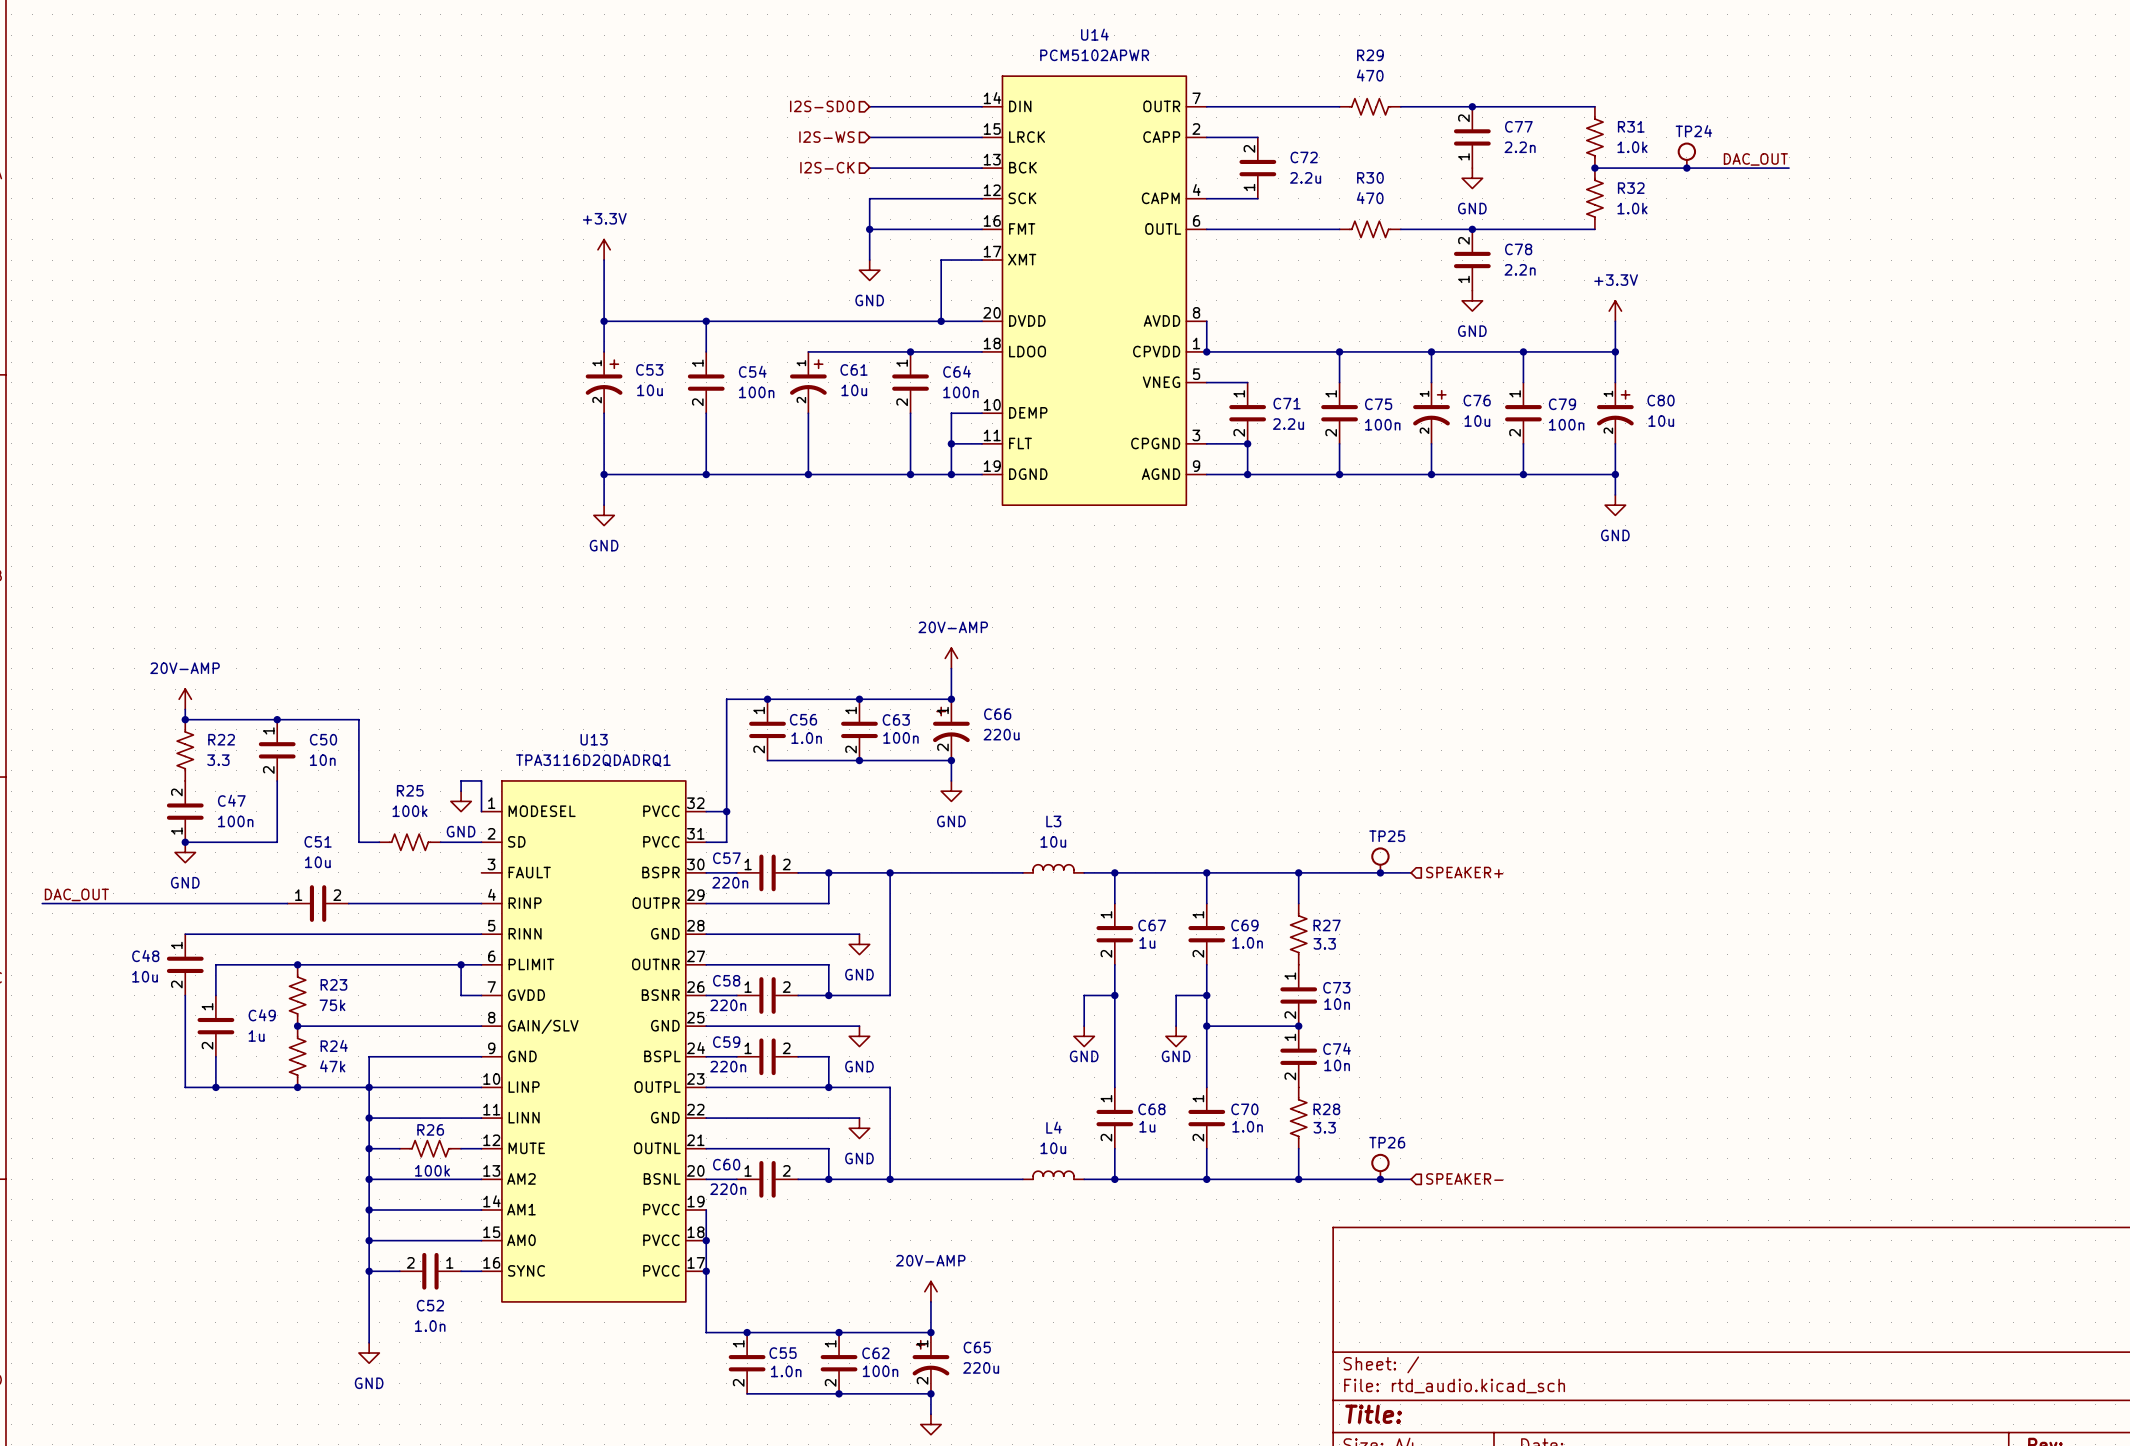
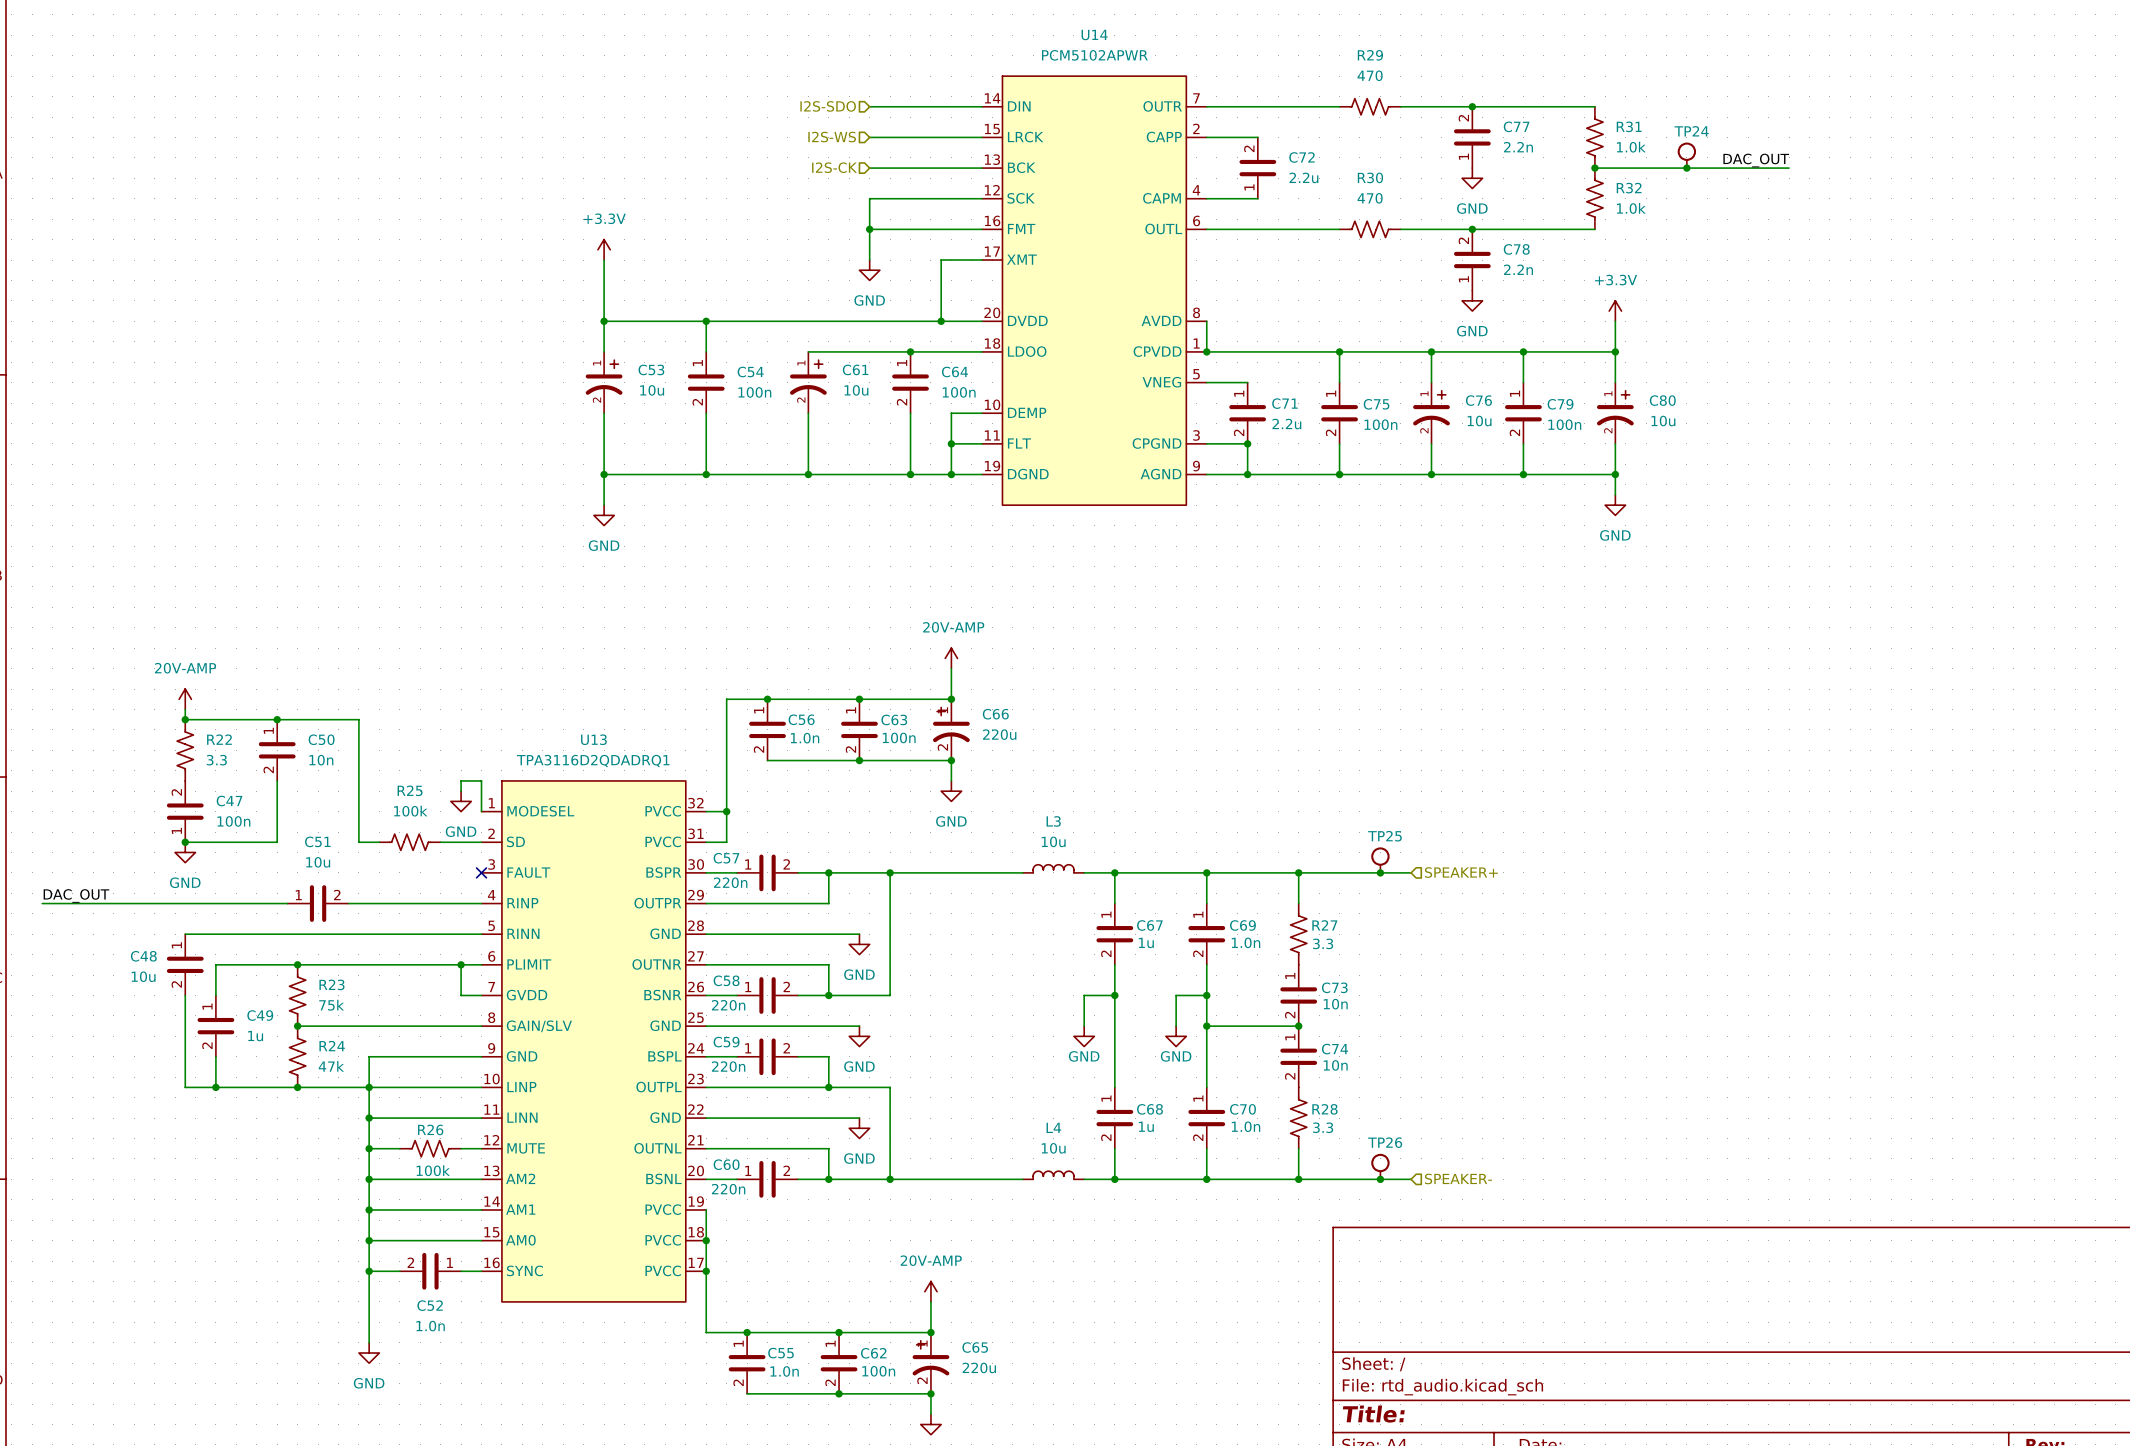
no-connect mark: none -> (481, 872)

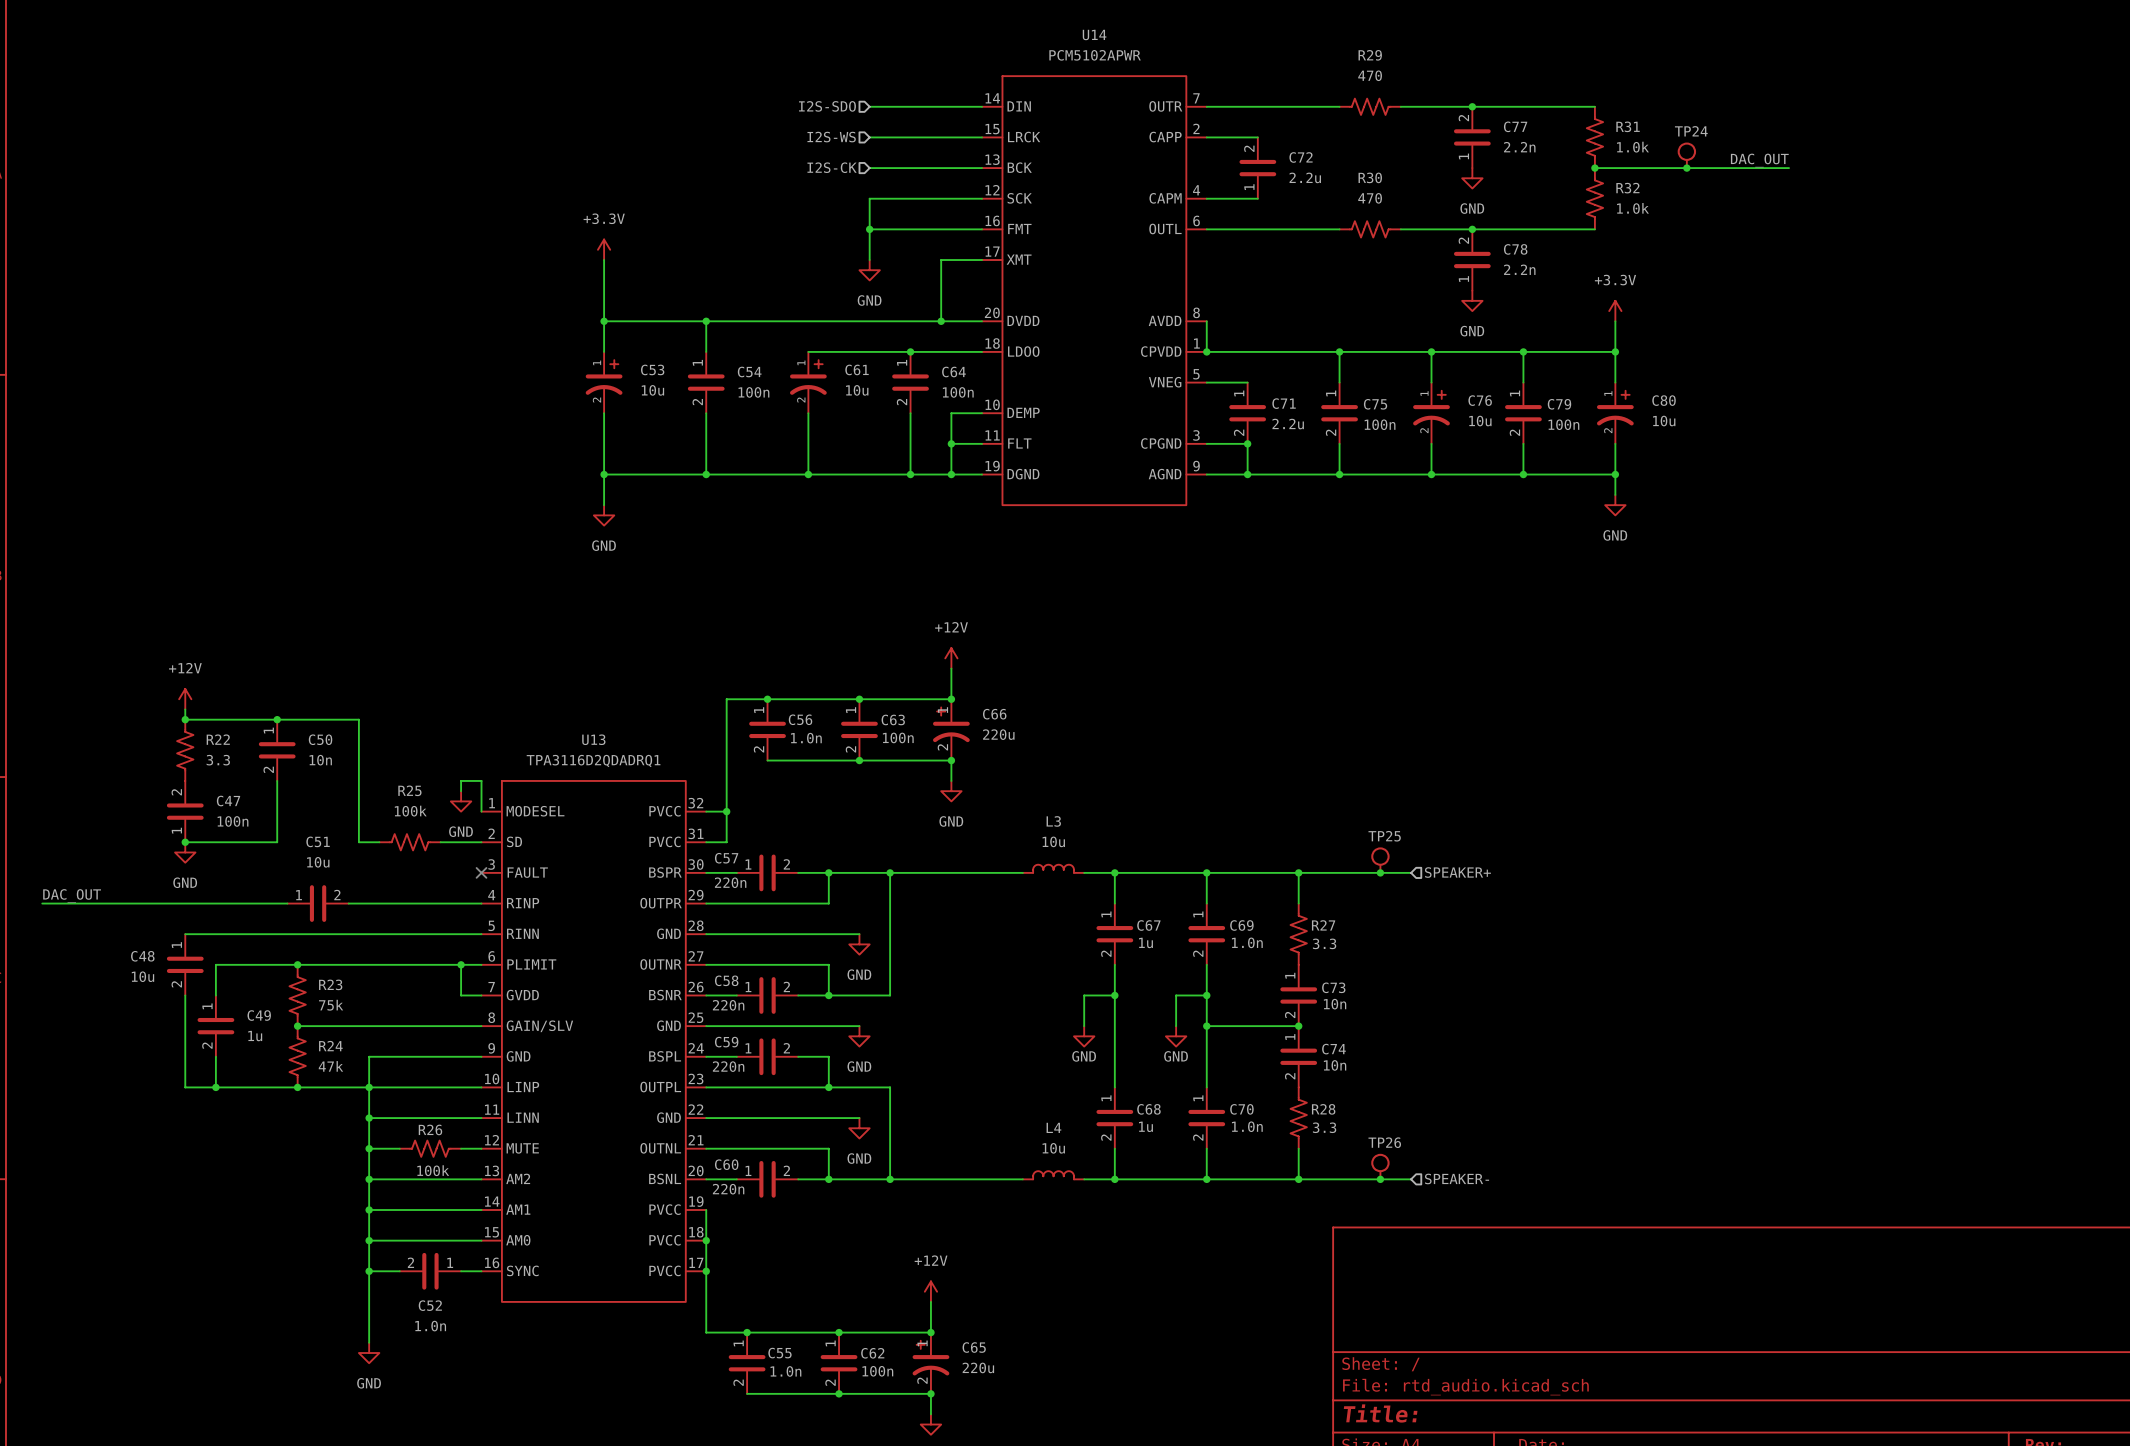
power symbol: 20V-AMP (951, 658) -> +12V (951, 658)
power symbol: 20V-AMP (185, 699) -> +12V (185, 699)
power symbol: 20V-AMP (930, 1291) -> +12V (930, 1291)

